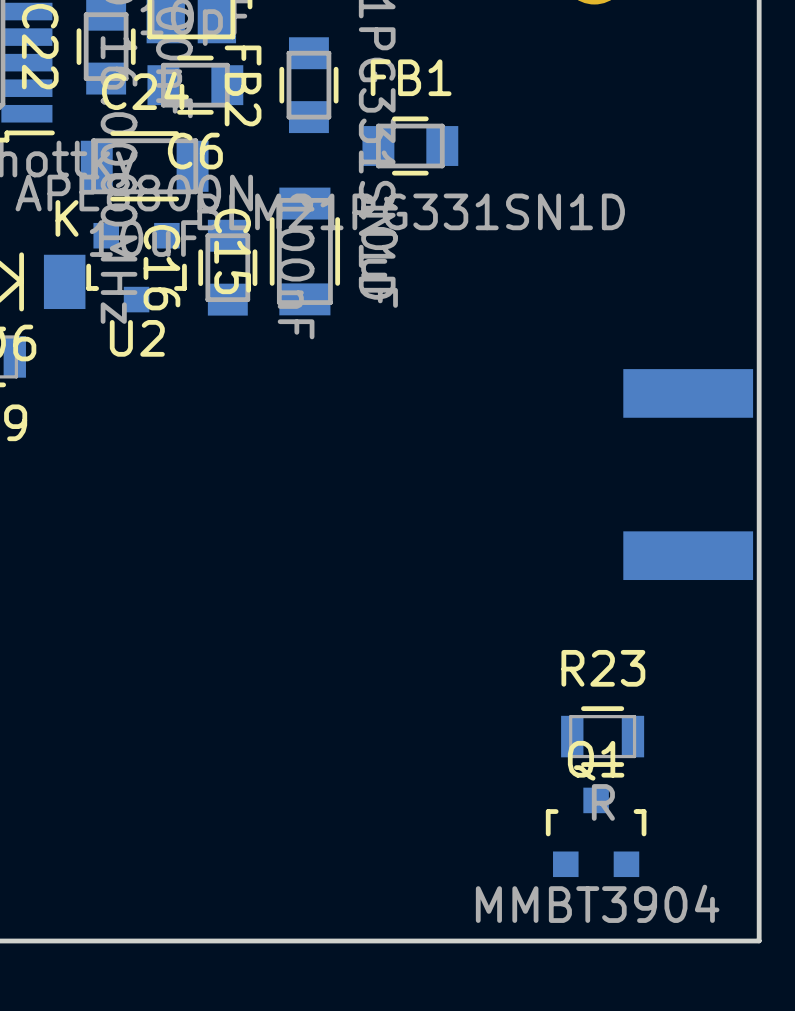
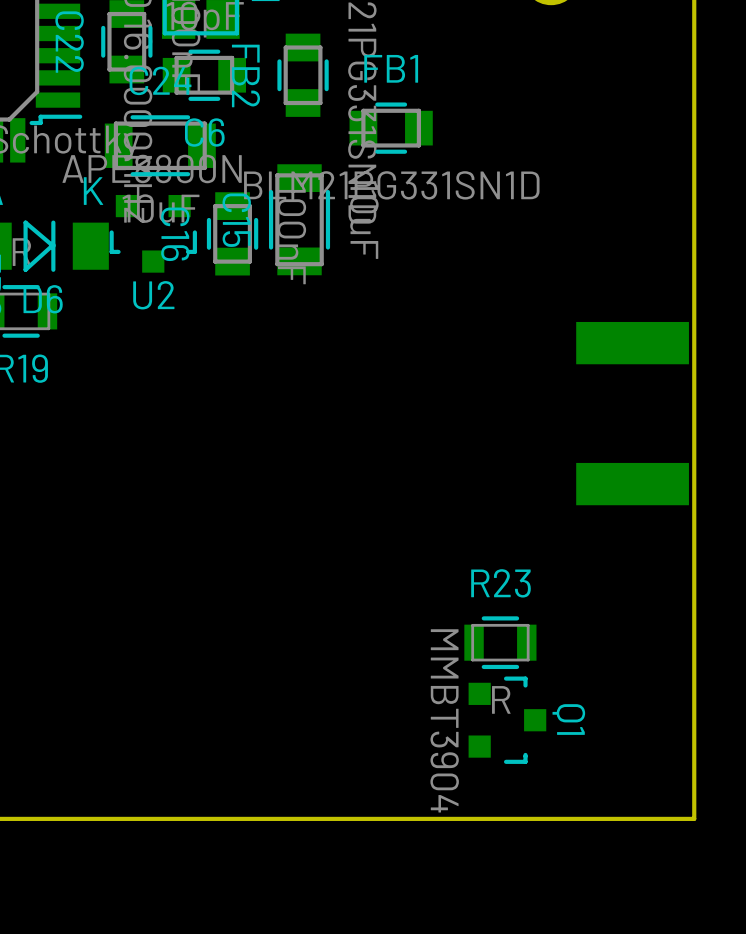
R23 position: (602, 736) -> (500, 642)
Q1 rotation: 0° (596, 832) -> 90° clockwise (507, 720)

